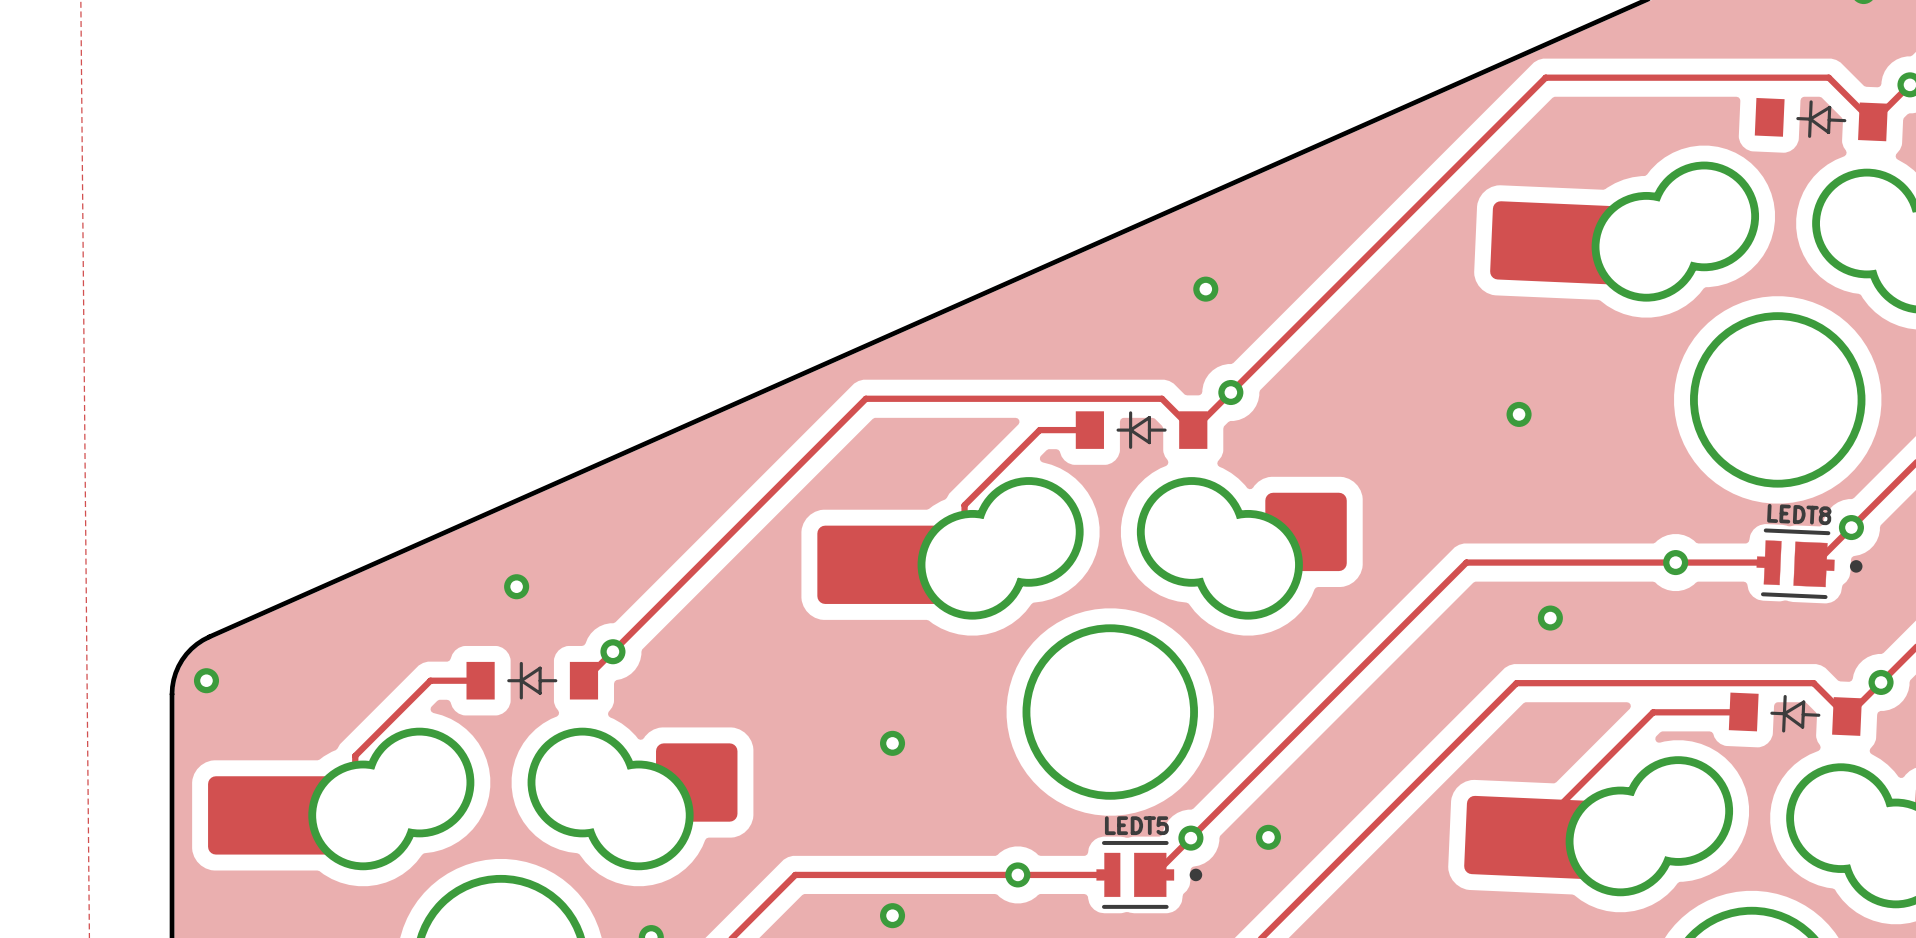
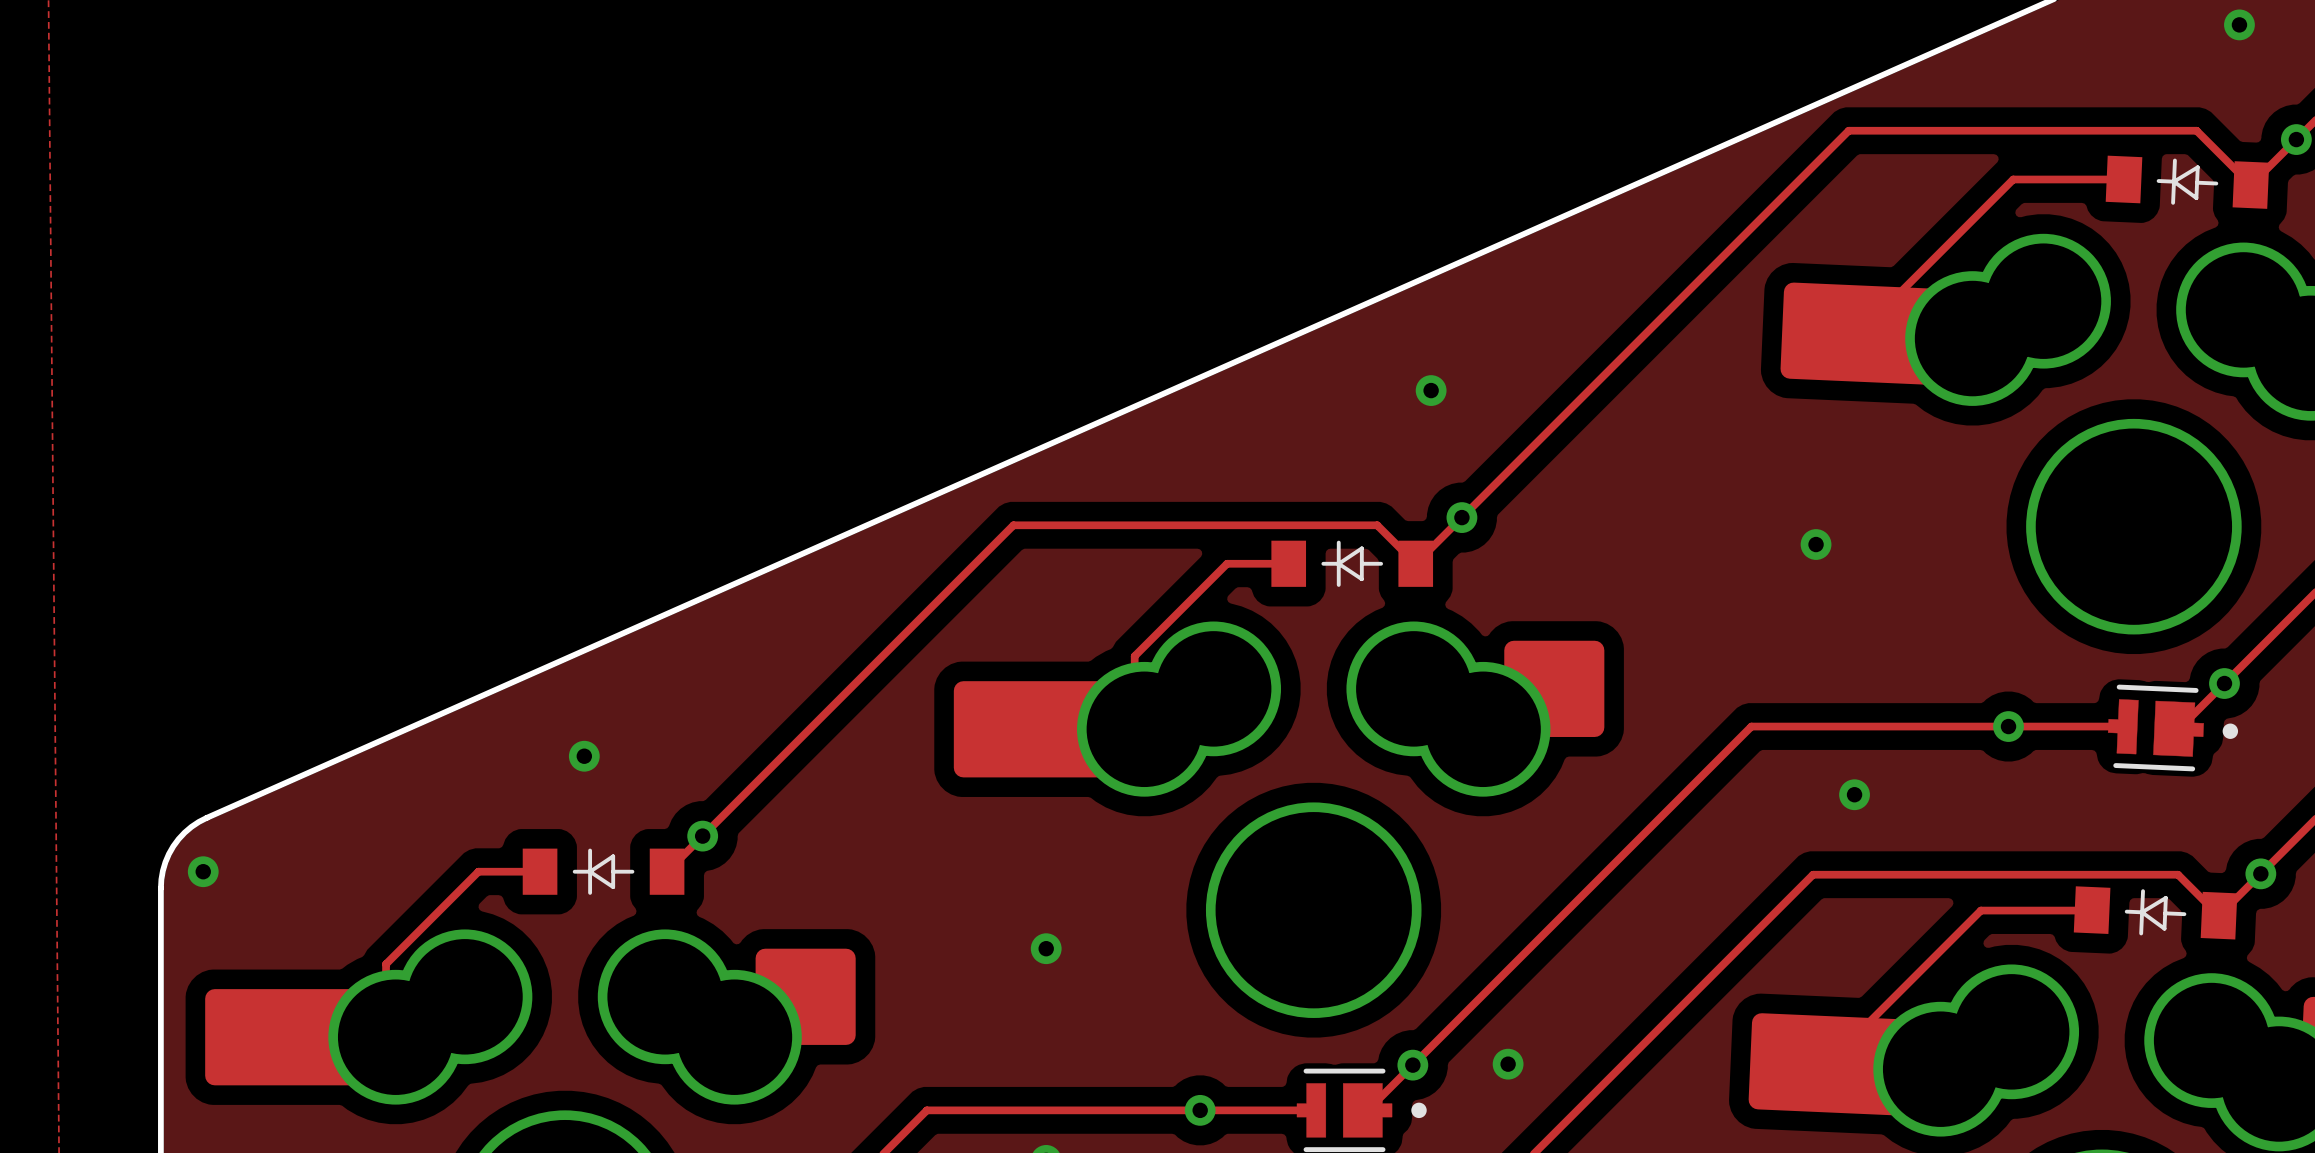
track: none -> (2124, 179) (2013, 179) (1859, 333)
LEDT8 name: LEDT8 (1799, 514) -> none
LEDT5 name: LEDT5 (1136, 825) -> none

